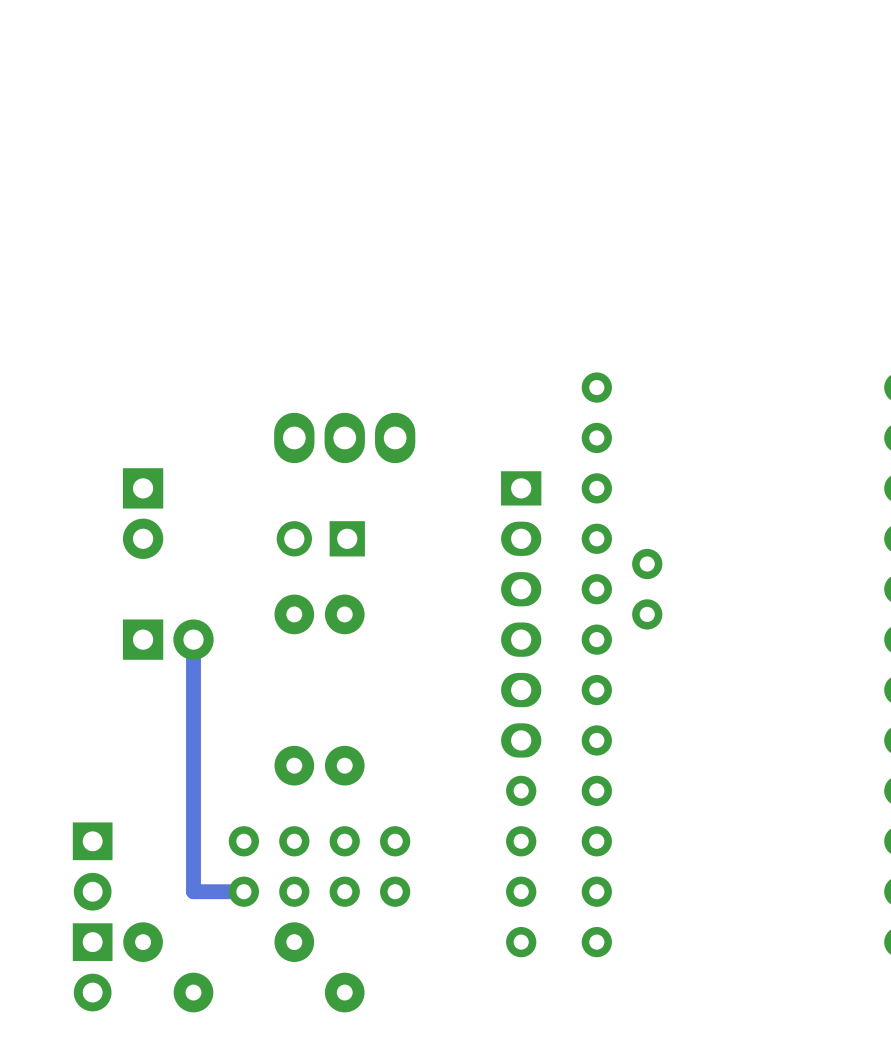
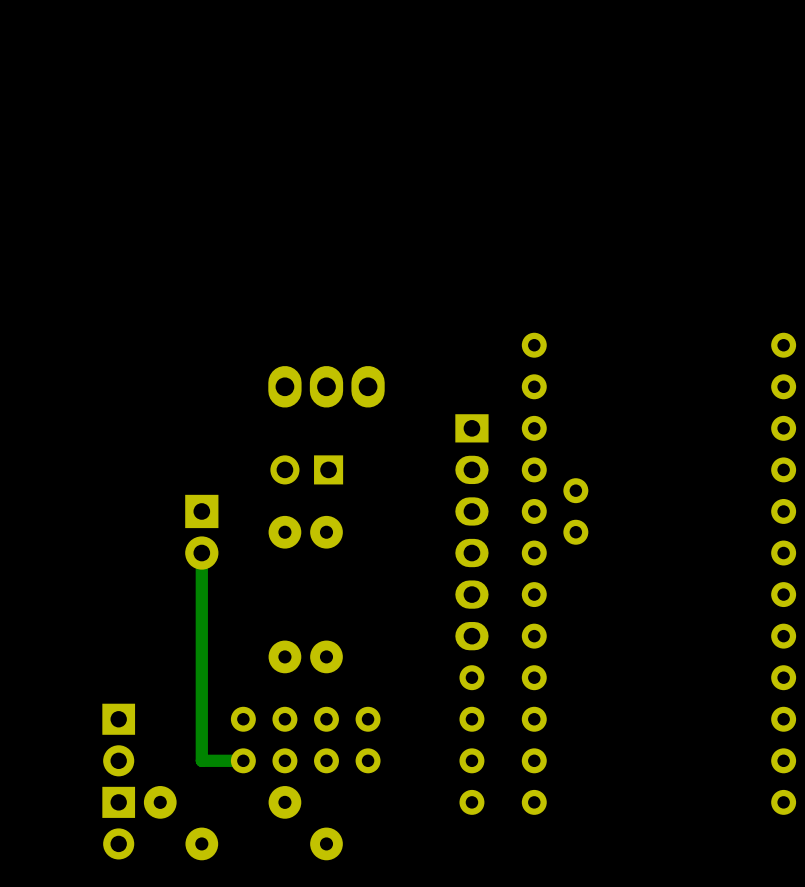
part: (143, 513) -> none
part rotation: 0° (168, 639) -> 90° clockwise (201, 532)

